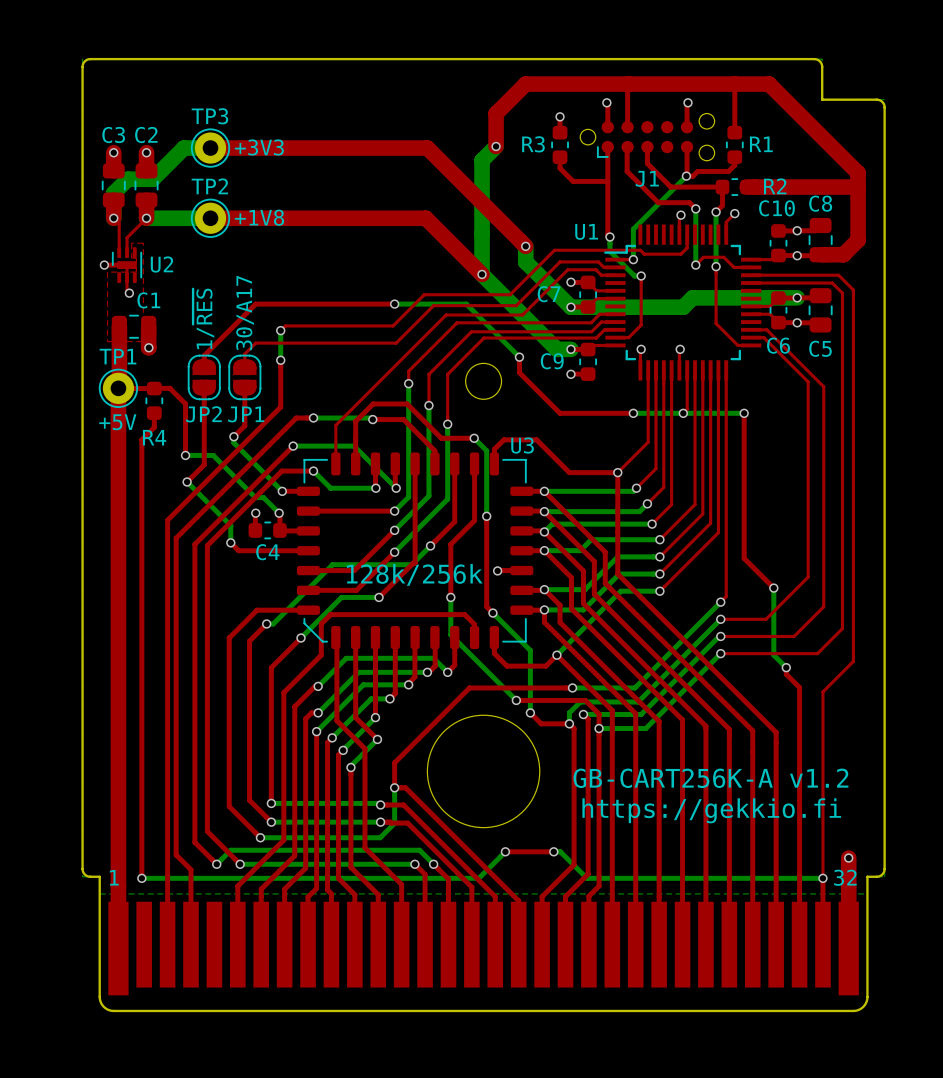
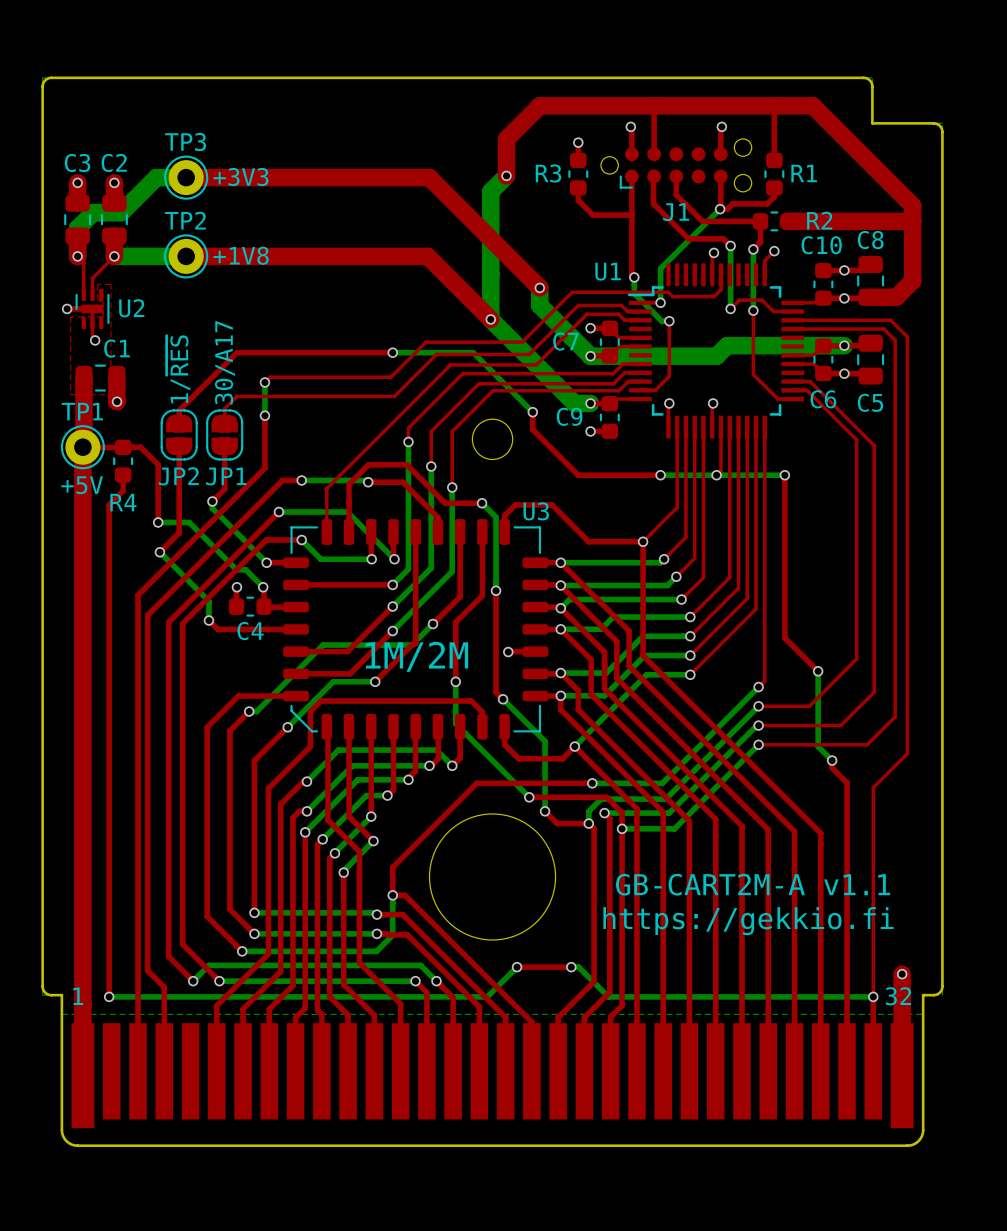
text: 128k/256k (414, 574) -> 1M/2M (416, 656)
text: GB-CART256K-A v1.2 (710, 778) -> GB-CART2M-A v1.1 (753, 884)

